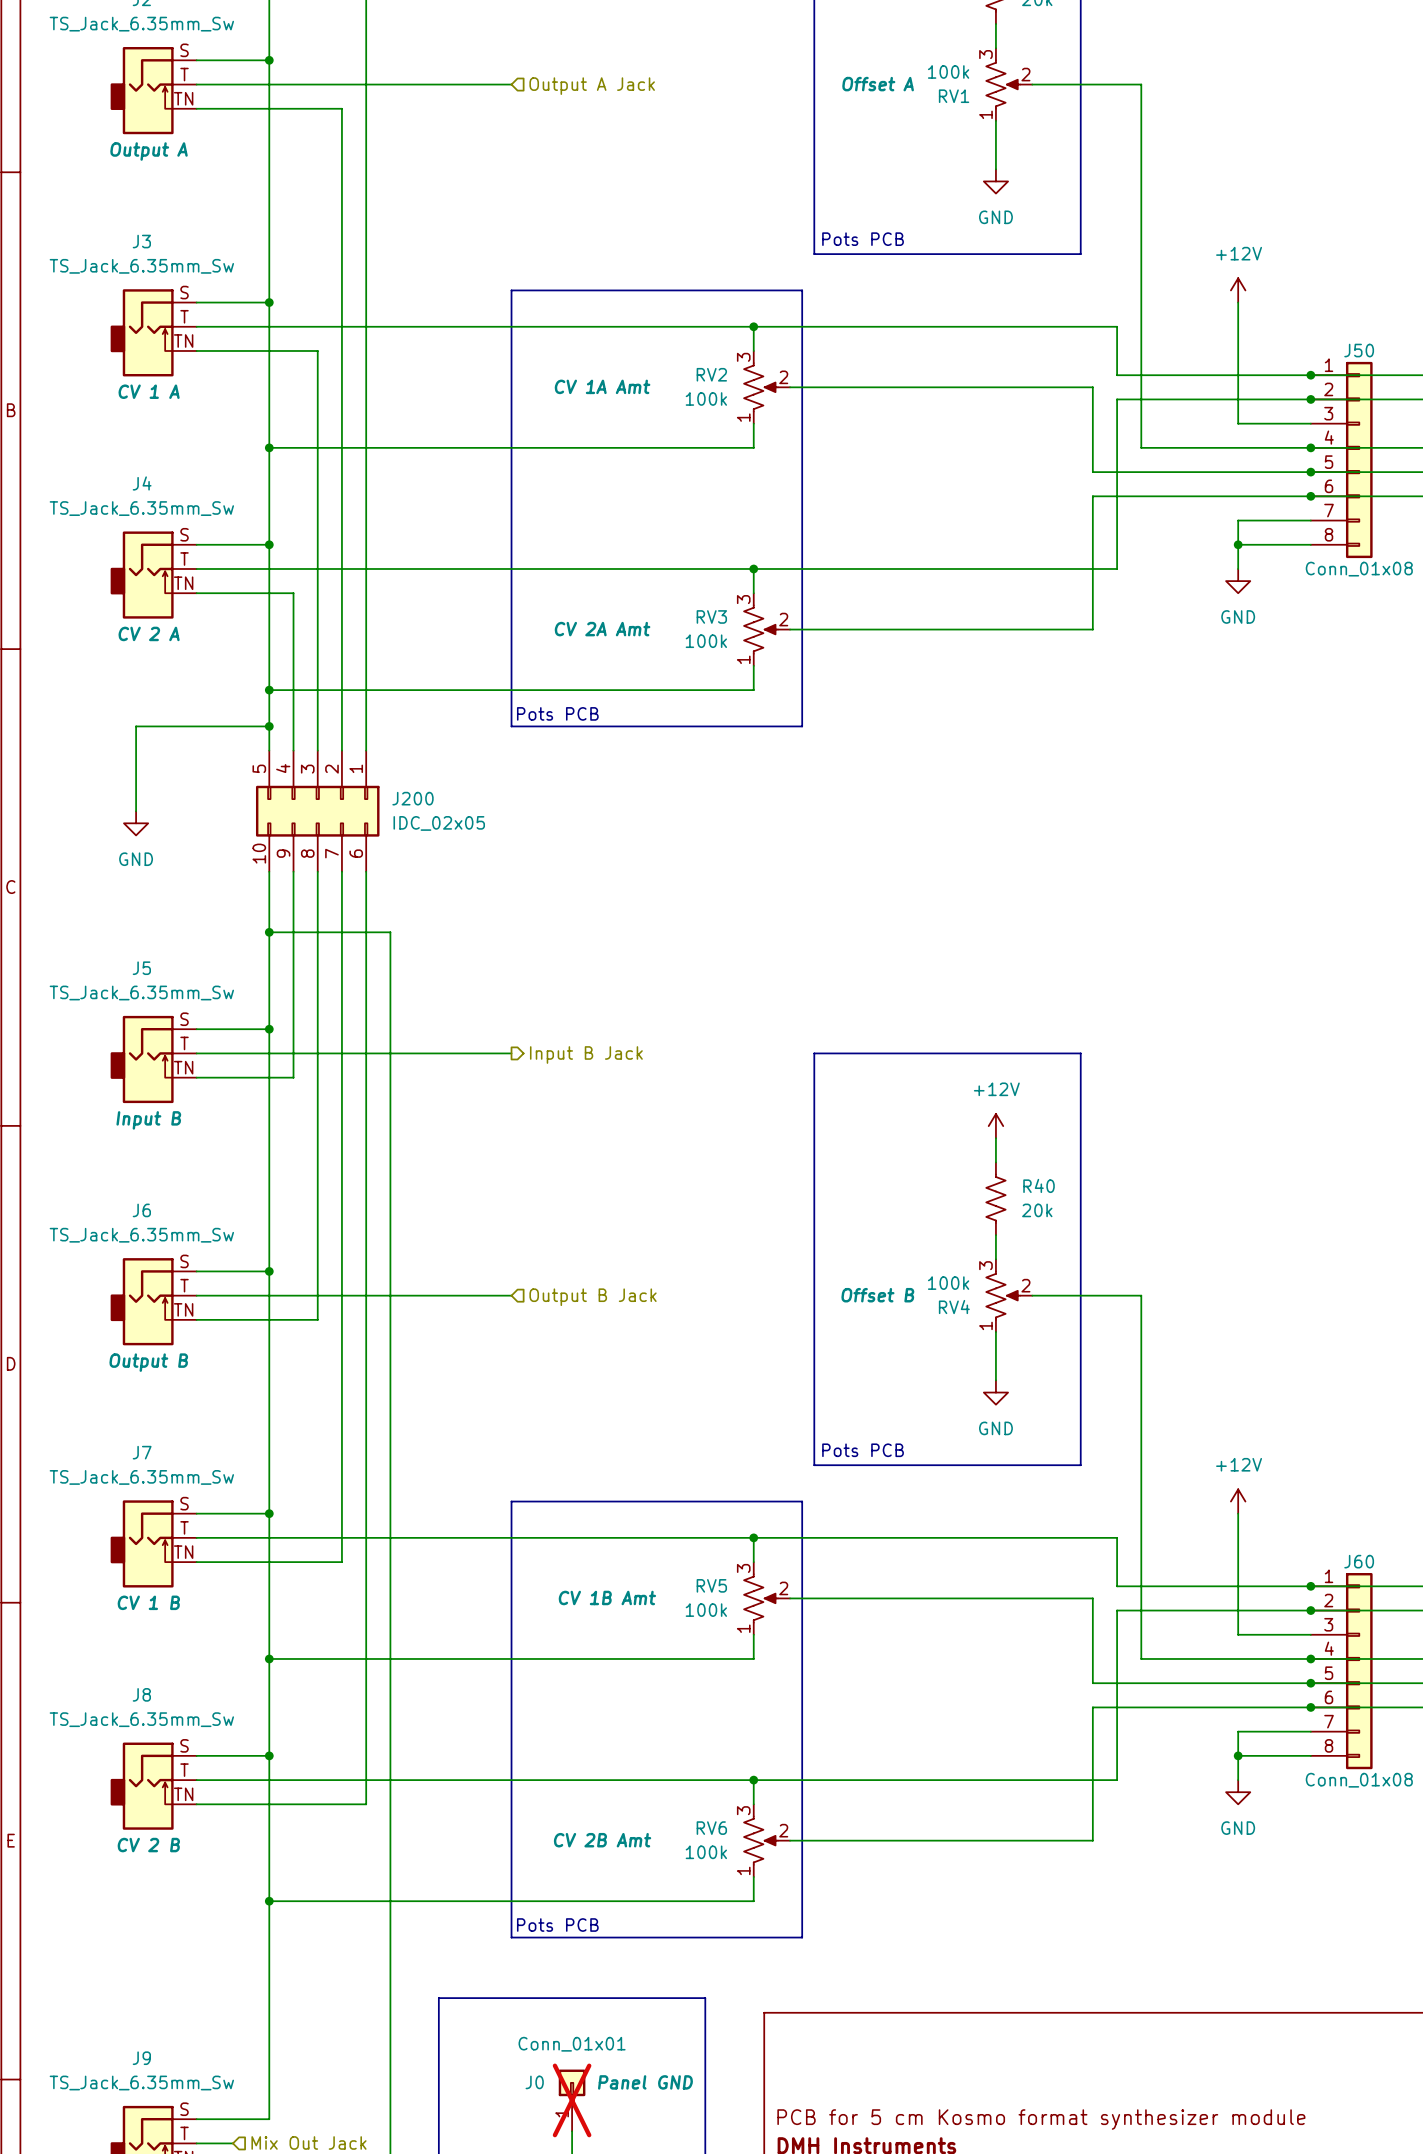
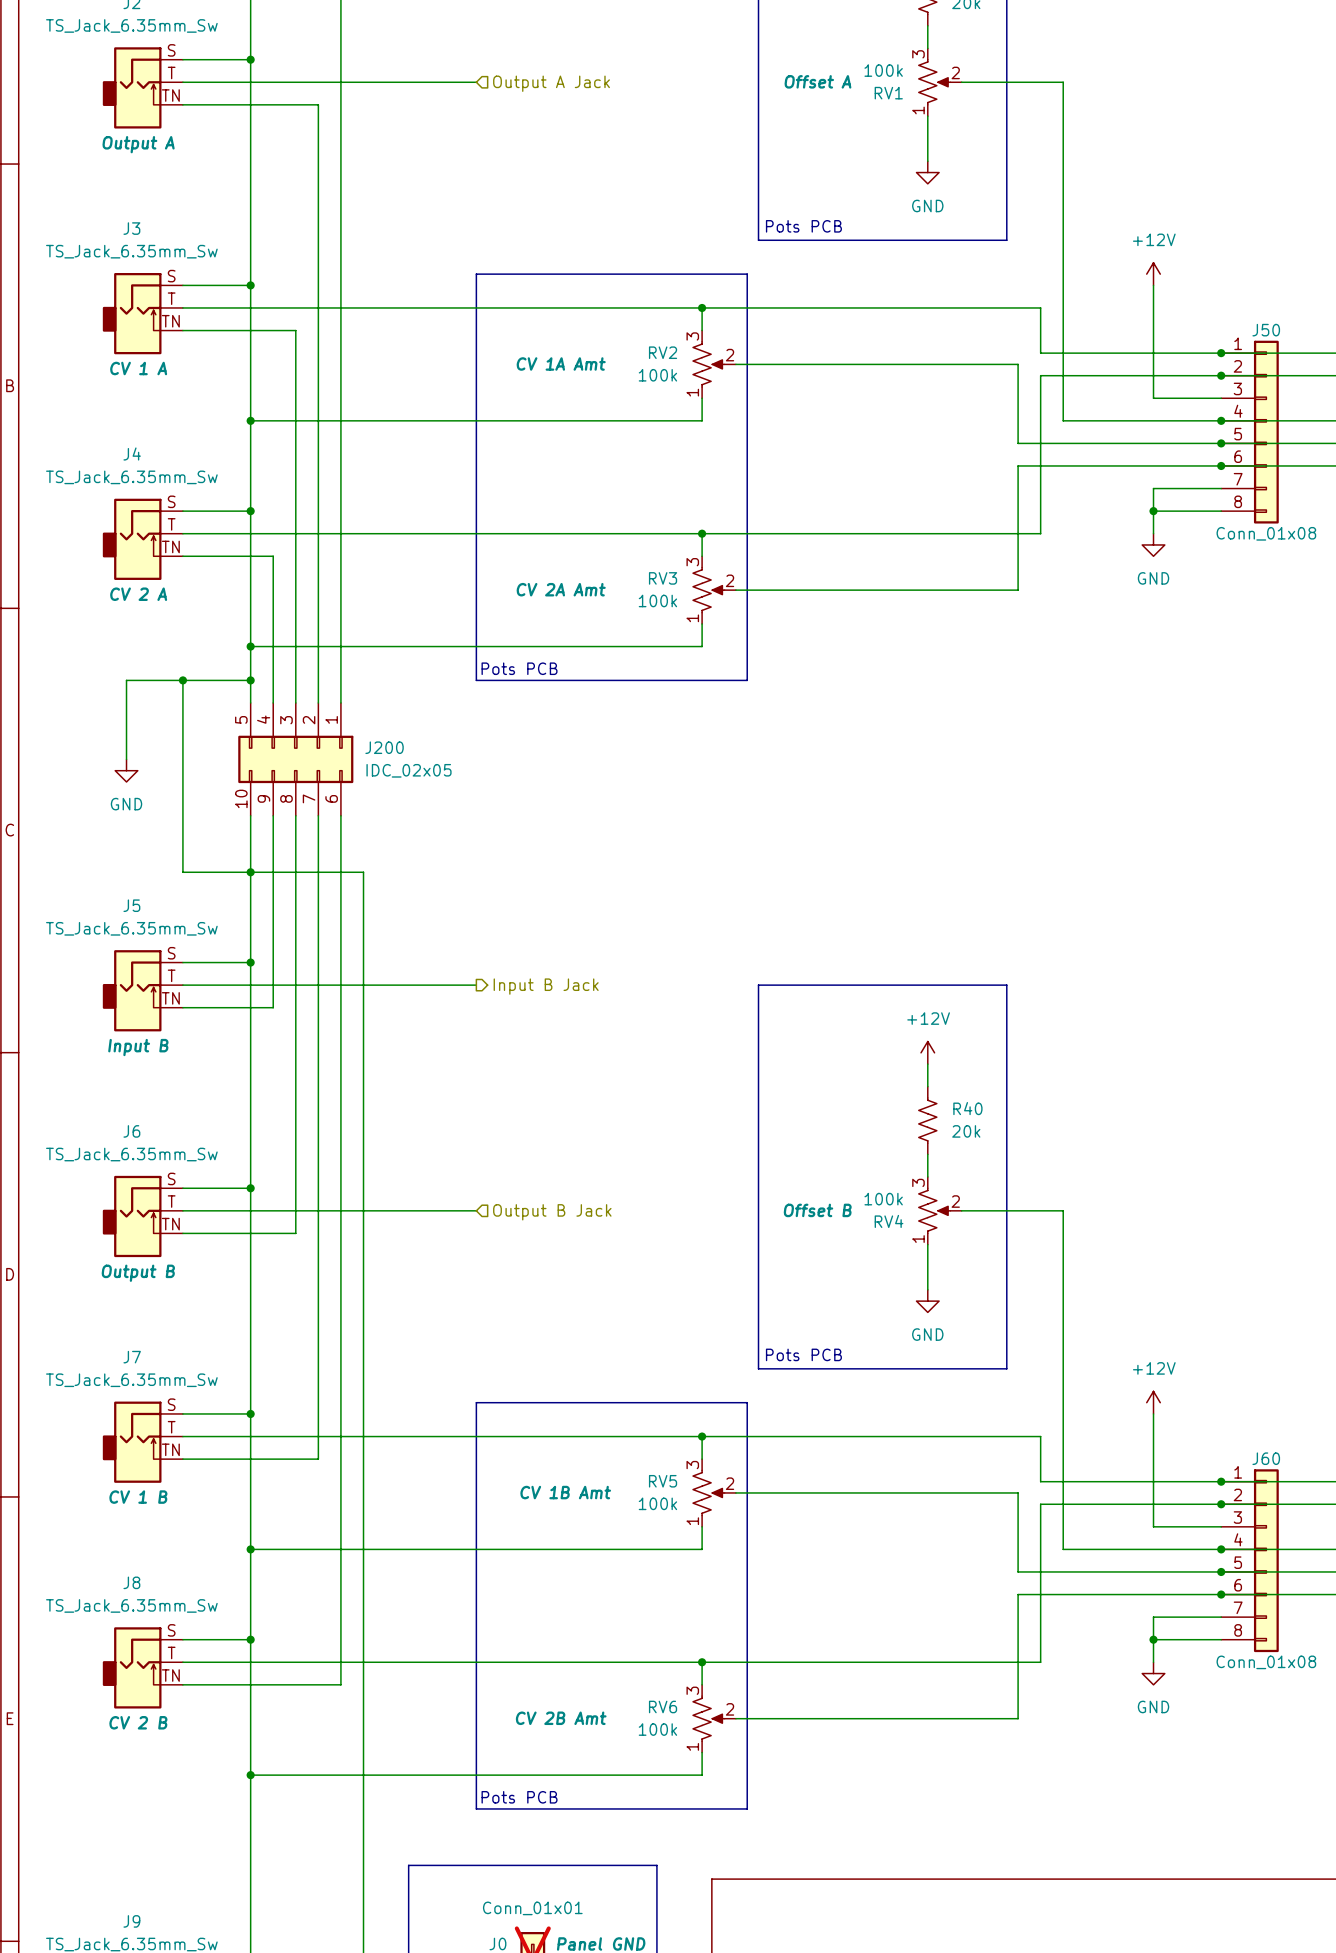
wire: none -> (182, 680) (182, 872) (250, 872)
junction: none -> (182, 680)

